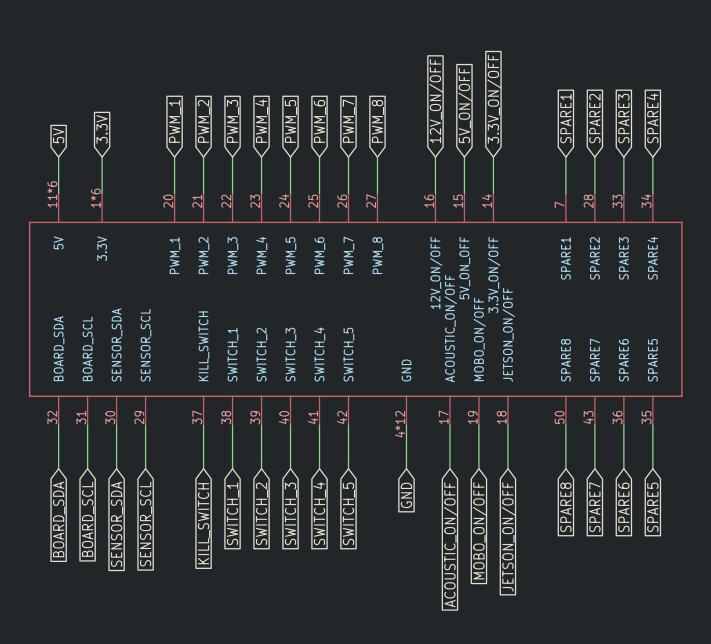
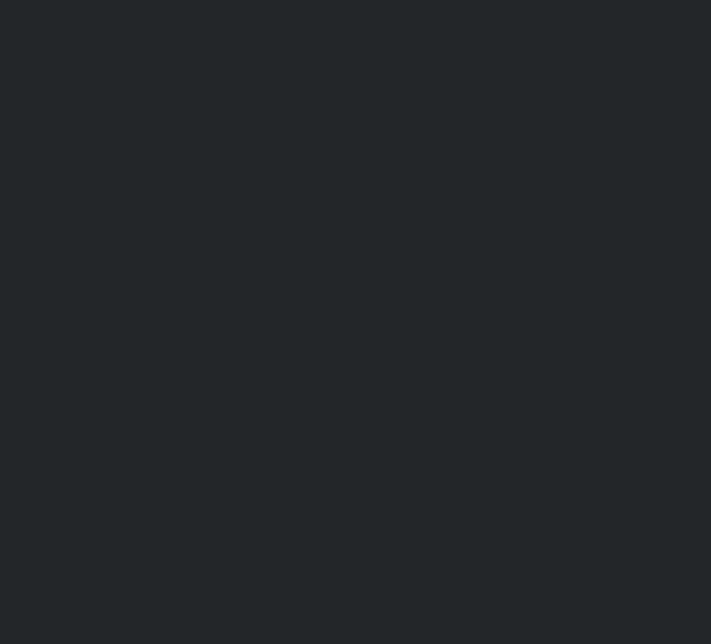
global label: 3.3V_ON/OFF (494, 99) -> none
global label: 12V_ON/OFF (436, 101) -> none
global label: 5V_ON/OFF (465, 105) -> none
global label: SPARE1 (565, 118) -> none
global label: SPARE2 (594, 118) -> none
global label: SPARE3 (623, 118) -> none
global label: SPARE4 (652, 118) -> none
global label: PWM_1 (175, 121) -> none
global label: PWM_2 (204, 121) -> none
global label: PWM_3 (233, 121) -> none
global label: PWM_4 (261, 121) -> none
global label: PWM_5 (291, 121) -> none
global label: PWM_6 (319, 121) -> none
global label: PWM_7 (348, 121) -> none
global label: PWM_8 (377, 121) -> none
global label: 3.3V (102, 129) -> none
global label: 5V (58, 135) -> none
wire: (58, 157) (58, 193) -> none
wire: (102, 157) (102, 193) -> none
wire: (174, 157) (174, 193) -> none
wire: (203, 157) (203, 193) -> none
wire: (232, 157) (232, 193) -> none
wire: (261, 157) (261, 193) -> none
wire: (290, 157) (290, 193) -> none
wire: (319, 157) (319, 193) -> none
wire: (348, 157) (348, 193) -> none
wire: (377, 157) (377, 193) -> none
wire: (435, 157) (435, 193) -> none
wire: (464, 157) (464, 193) -> none
wire: (493, 157) (493, 193) -> none
wire: (565, 157) (565, 193) -> none
wire: (594, 157) (594, 193) -> none
wire: (623, 157) (623, 193) -> none
wire: (652, 157) (652, 193) -> none
part: (355, 309) -> none
wire: (58, 425) (58, 468) -> none
wire: (87, 425) (87, 468) -> none
wire: (116, 425) (116, 468) -> none
wire: (145, 425) (145, 468) -> none
wire: (203, 425) (203, 468) -> none
wire: (232, 425) (232, 468) -> none
wire: (261, 425) (261, 468) -> none
wire: (290, 425) (290, 468) -> none
wire: (319, 425) (319, 468) -> none
wire: (348, 425) (348, 468) -> none
wire: (406, 425) (406, 468) -> none
wire: (449, 425) (449, 468) -> none
wire: (478, 425) (478, 468) -> none
wire: (507, 425) (507, 468) -> none
wire: (565, 425) (565, 468) -> none
wire: (594, 425) (594, 468) -> none
wire: (623, 425) (623, 468) -> none
wire: (652, 425) (652, 468) -> none
global label: GND (406, 495) -> none
global label: SPARE8 (565, 507) -> none
global label: SPARE7 (594, 507) -> none
global label: SPARE6 (623, 507) -> none
global label: SPARE5 (652, 507) -> none
global label: SWITCH_1 (233, 513) -> none
global label: SWITCH_2 (262, 513) -> none
global label: SWITCH_3 (291, 513) -> none
global label: SWITCH_4 (319, 513) -> none
global label: SWITCH_5 (348, 513) -> none
global label: BOARD_SDA (59, 519) -> none
global label: BOARD_SCL (88, 519) -> none
global label: KILL_SWITCH (204, 523) -> none
global label: SENSOR_SDA (117, 524) -> none
global label: SENSOR_SCL (146, 524) -> none
global label: MOBO_ON/OFF (479, 530) -> none
global label: JETSON_ON/OFF (508, 536) -> none
global label: ACOUSTIC_ON/OFF (450, 544) -> none

